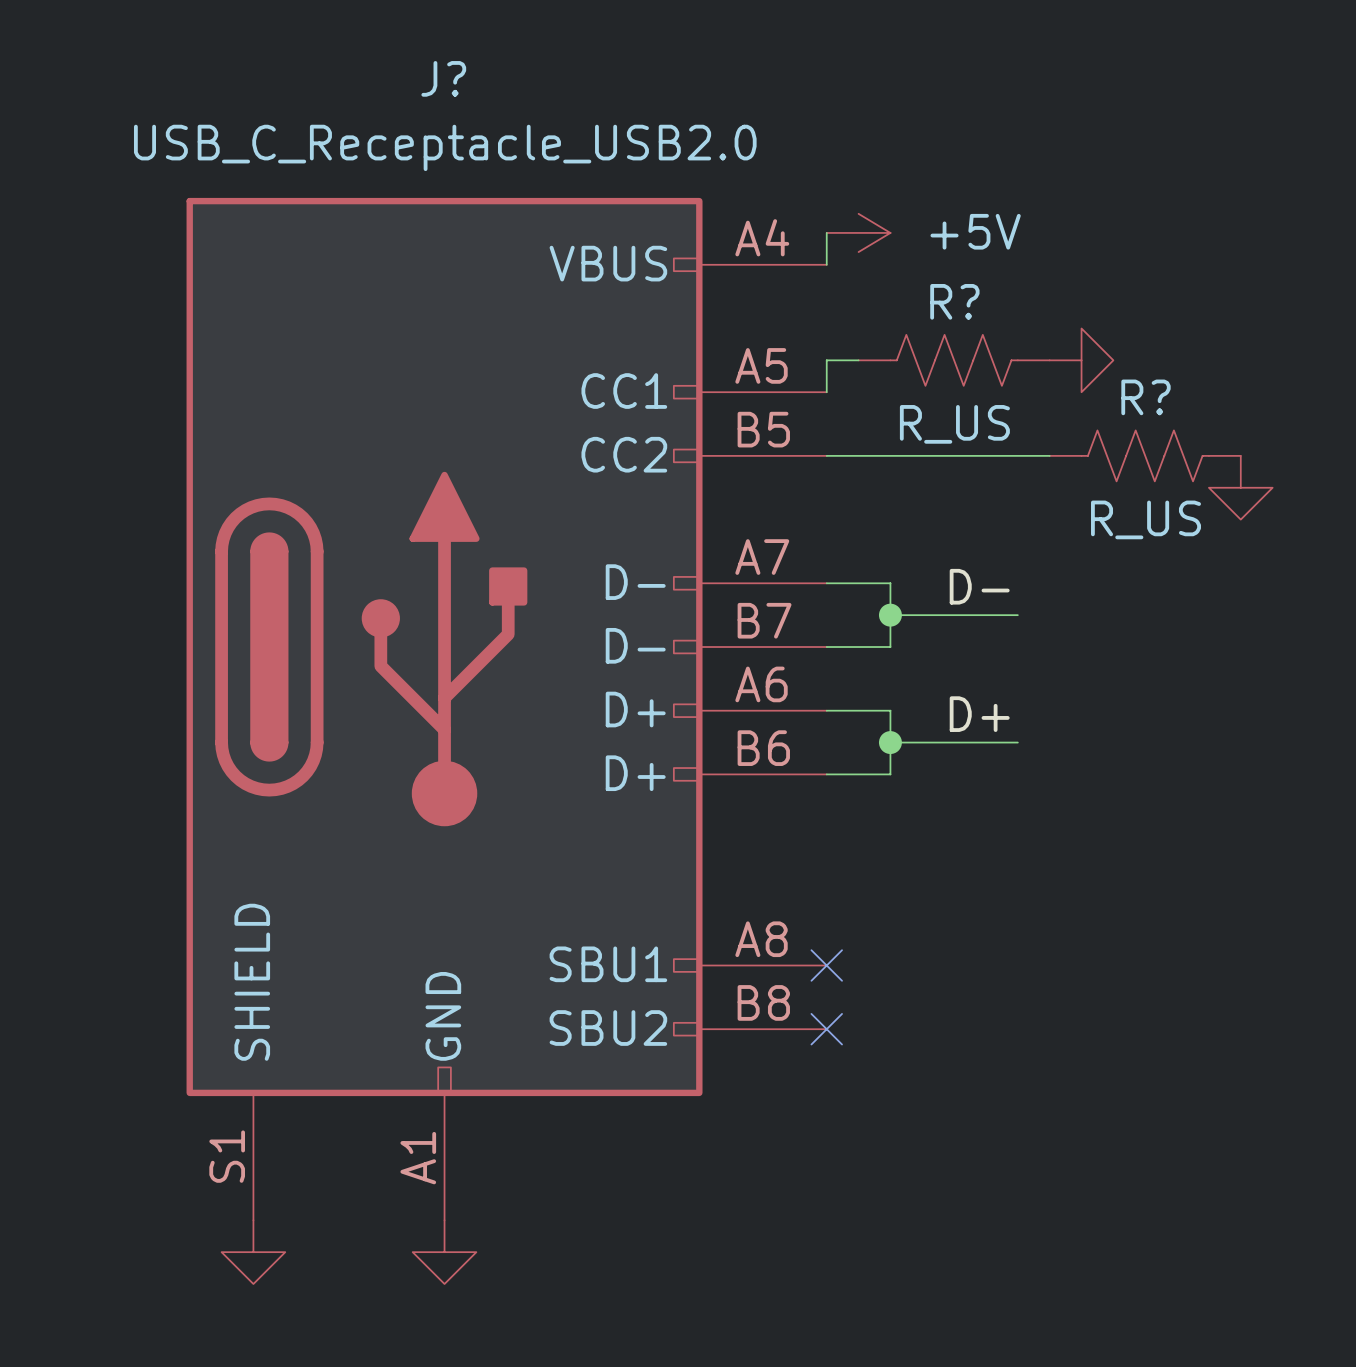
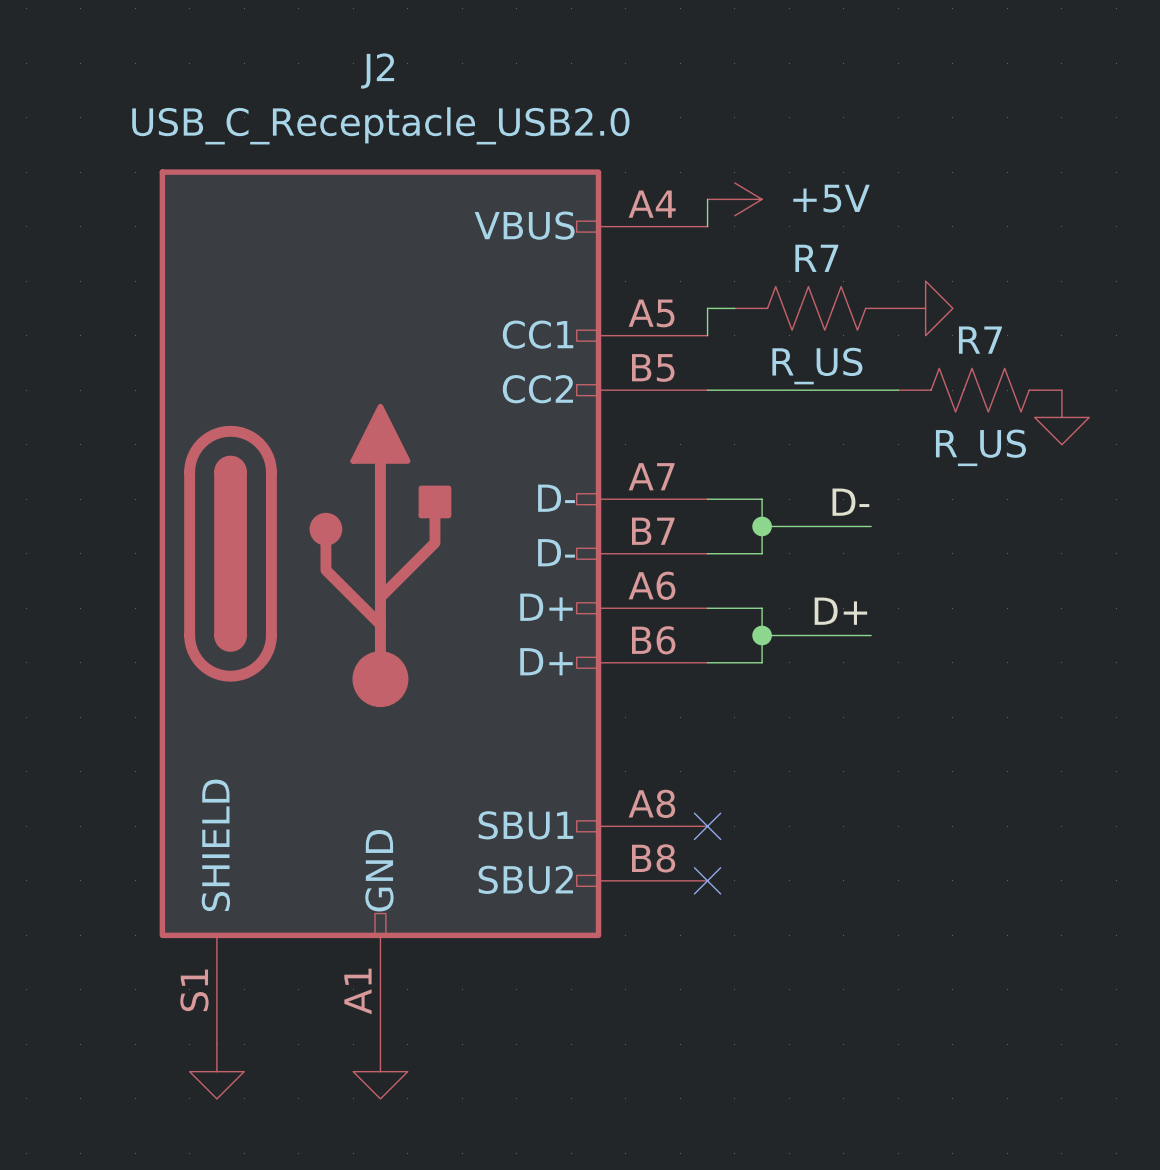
J? name: J? (443, 78) -> J2 (377, 71)
R? name: R? (954, 301) -> R7 (816, 258)
R? name: R? (1146, 397) -> R7 (980, 340)

